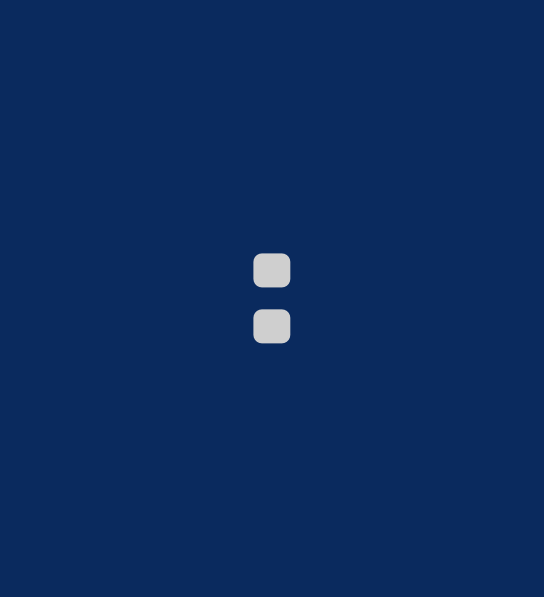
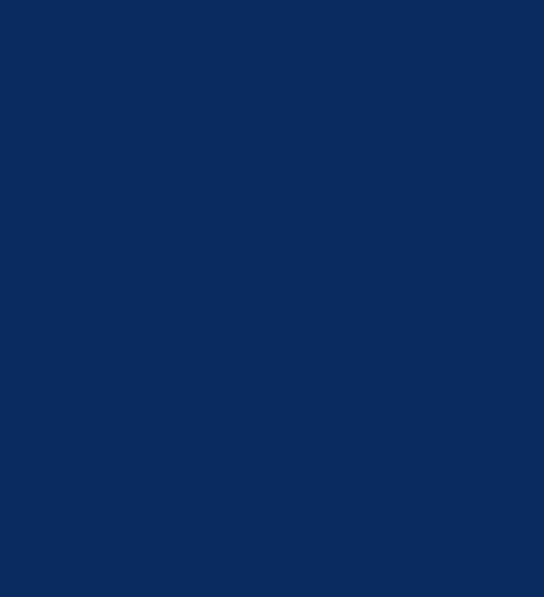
part: (271, 298) -> none

